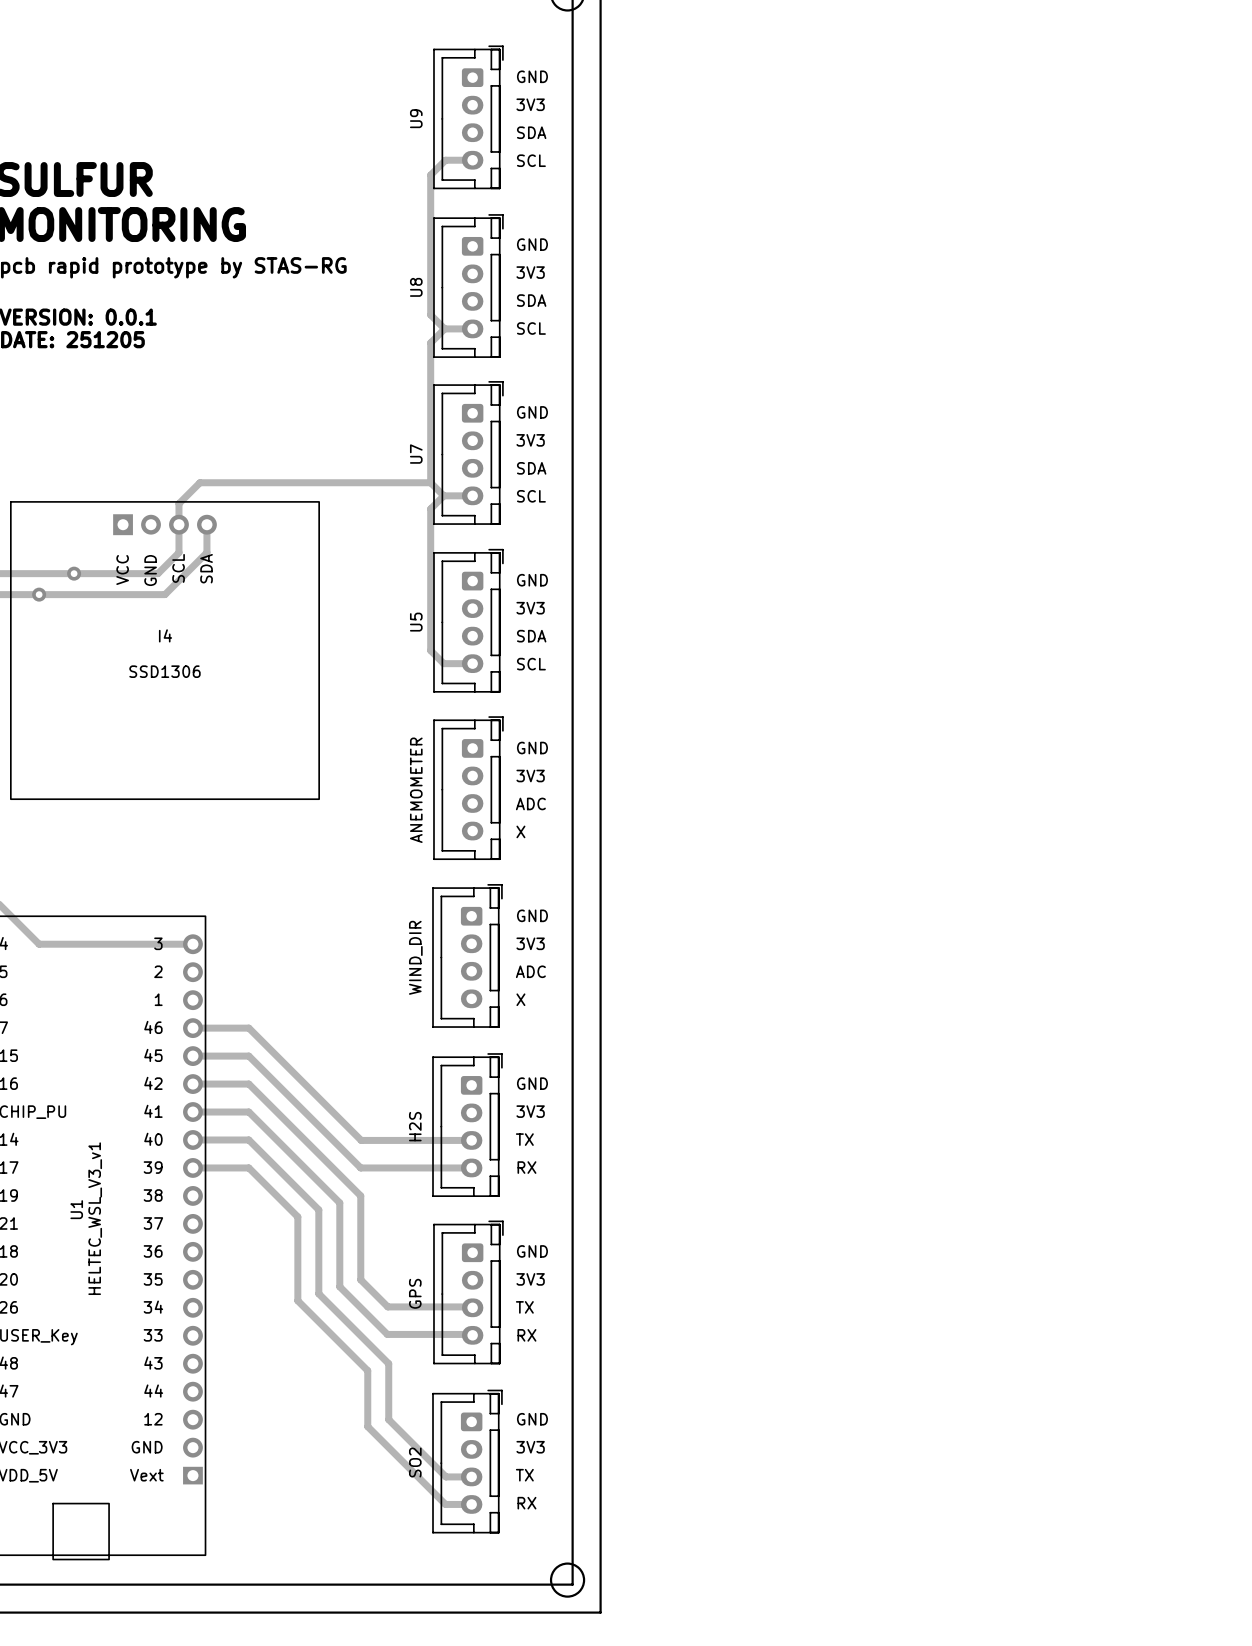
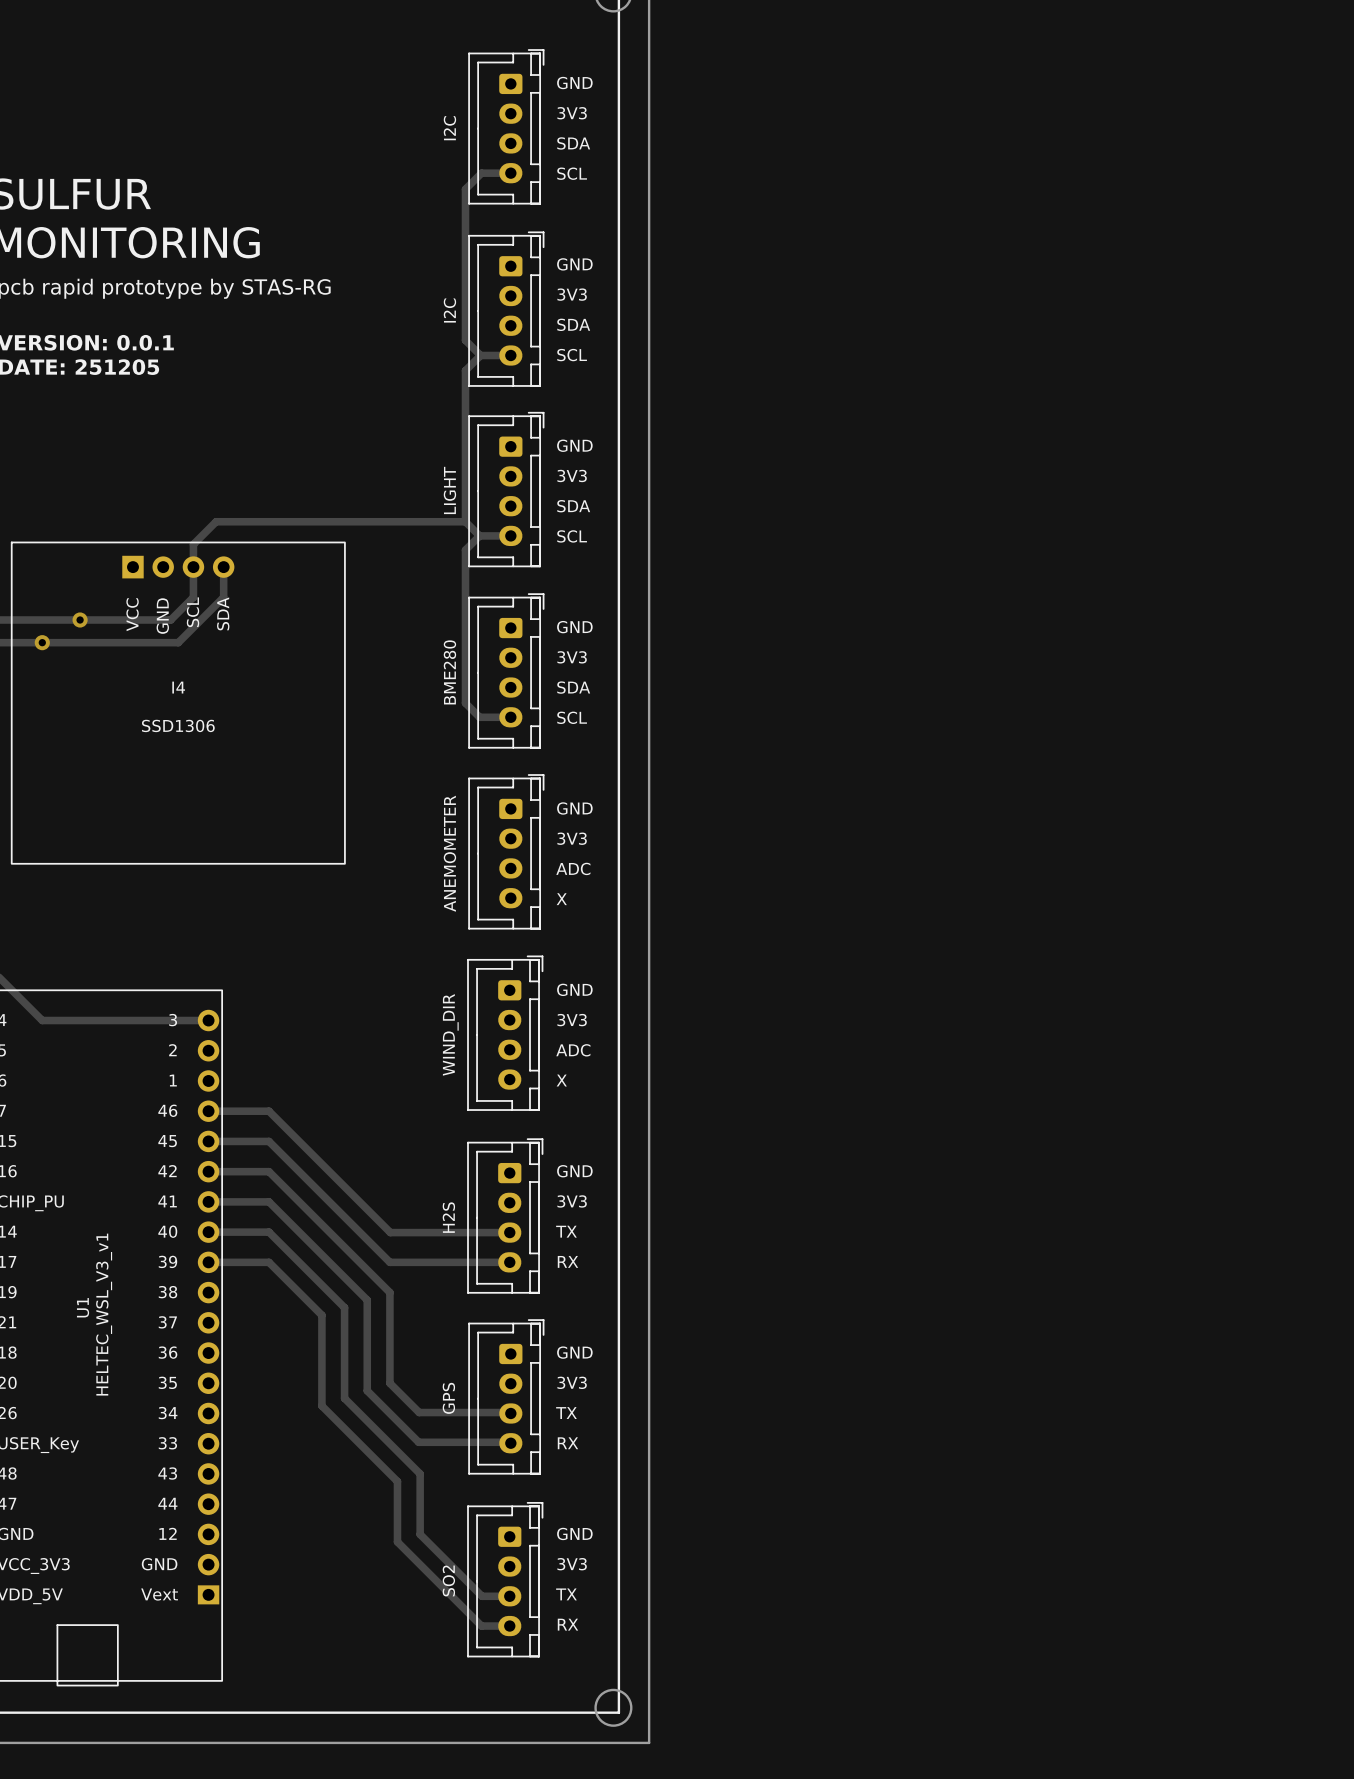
U9 name: U9 (416, 118) -> I2C (449, 128)
U8 name: U8 (416, 287) -> I2C (449, 310)
U7 name: U7 (416, 454) -> LIGHT (449, 490)
U5 name: U5 (416, 622) -> BME280 (449, 672)

